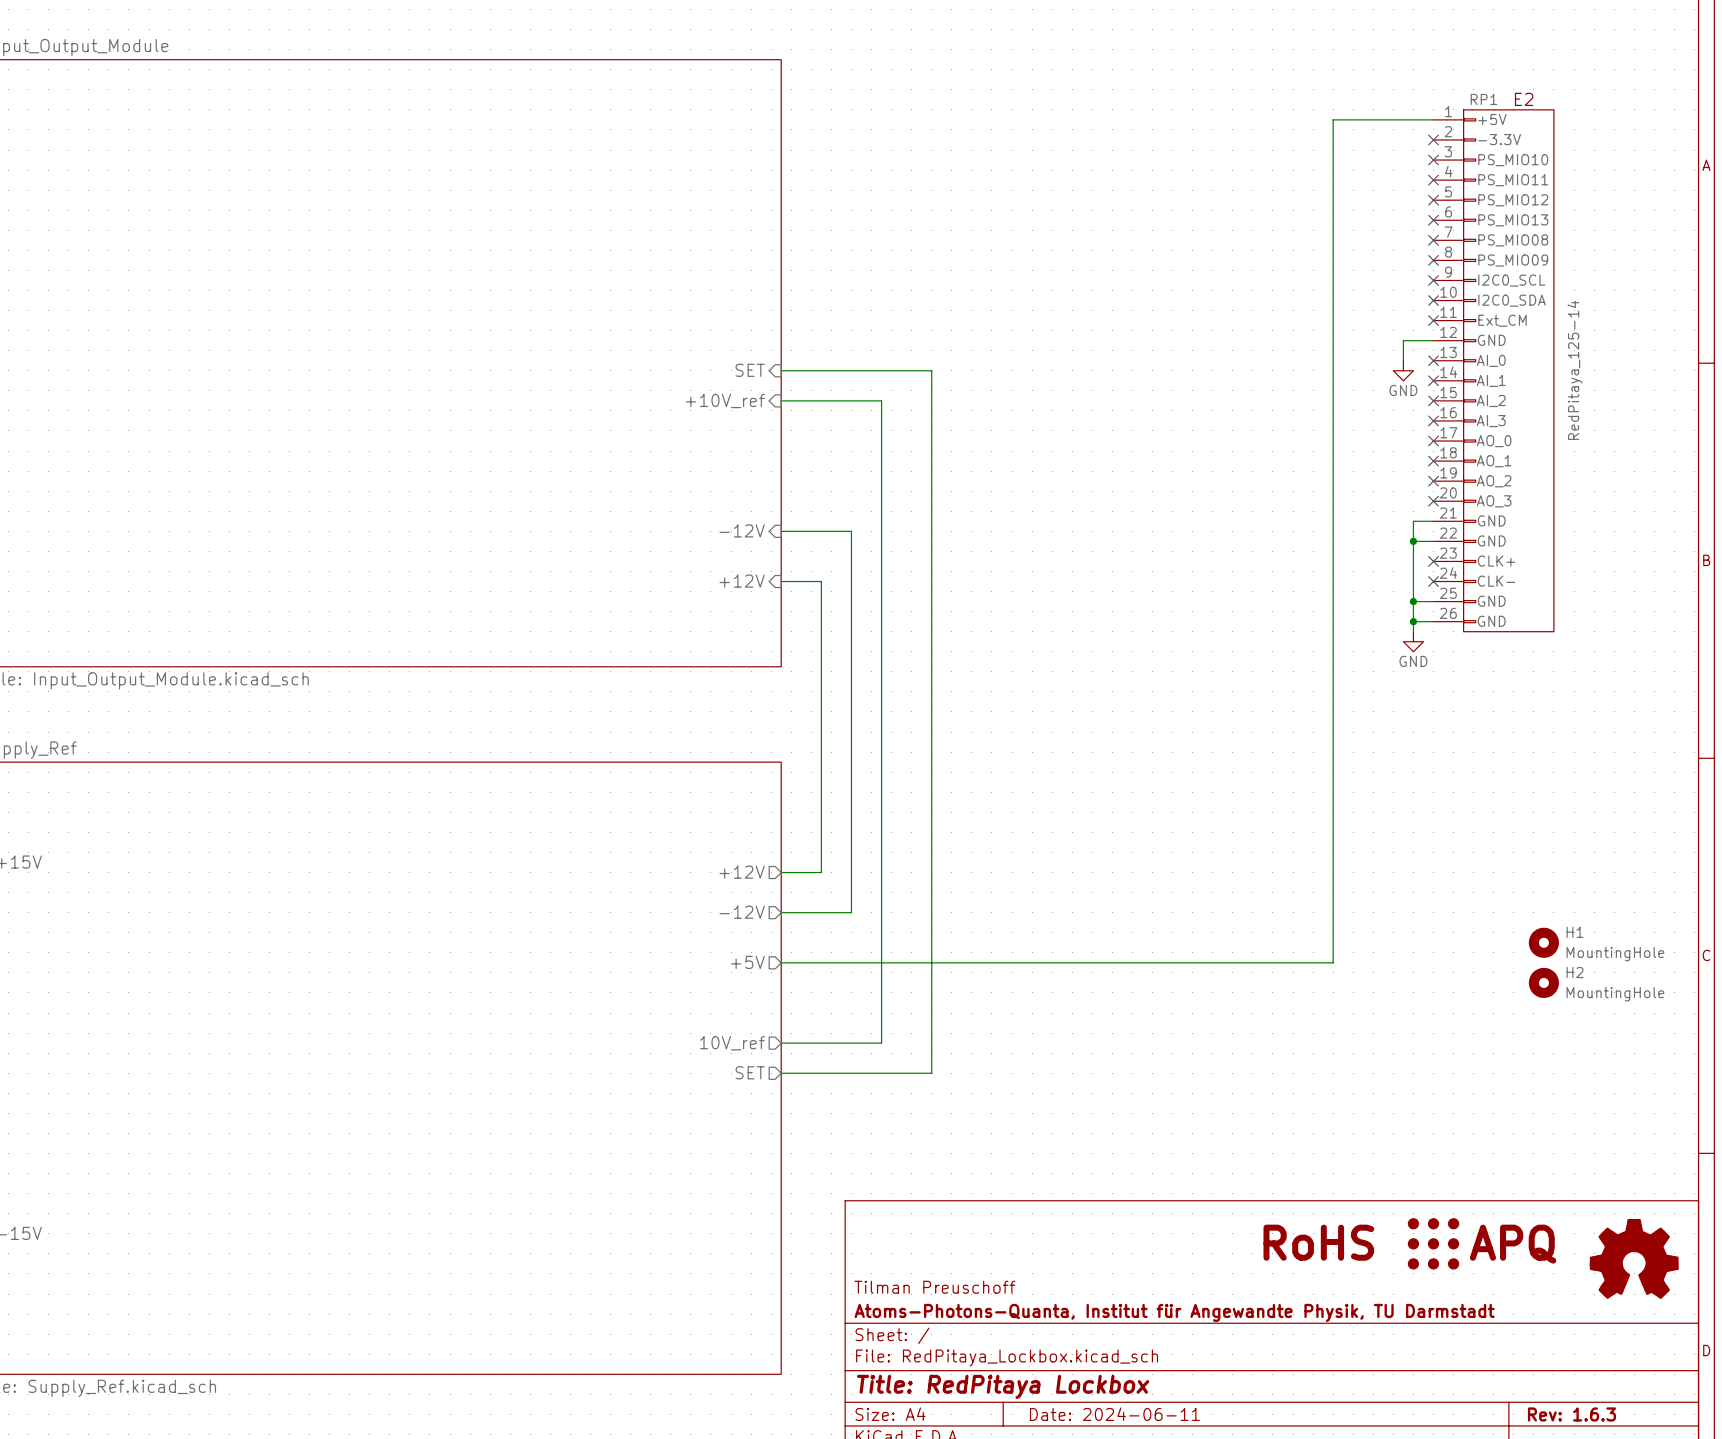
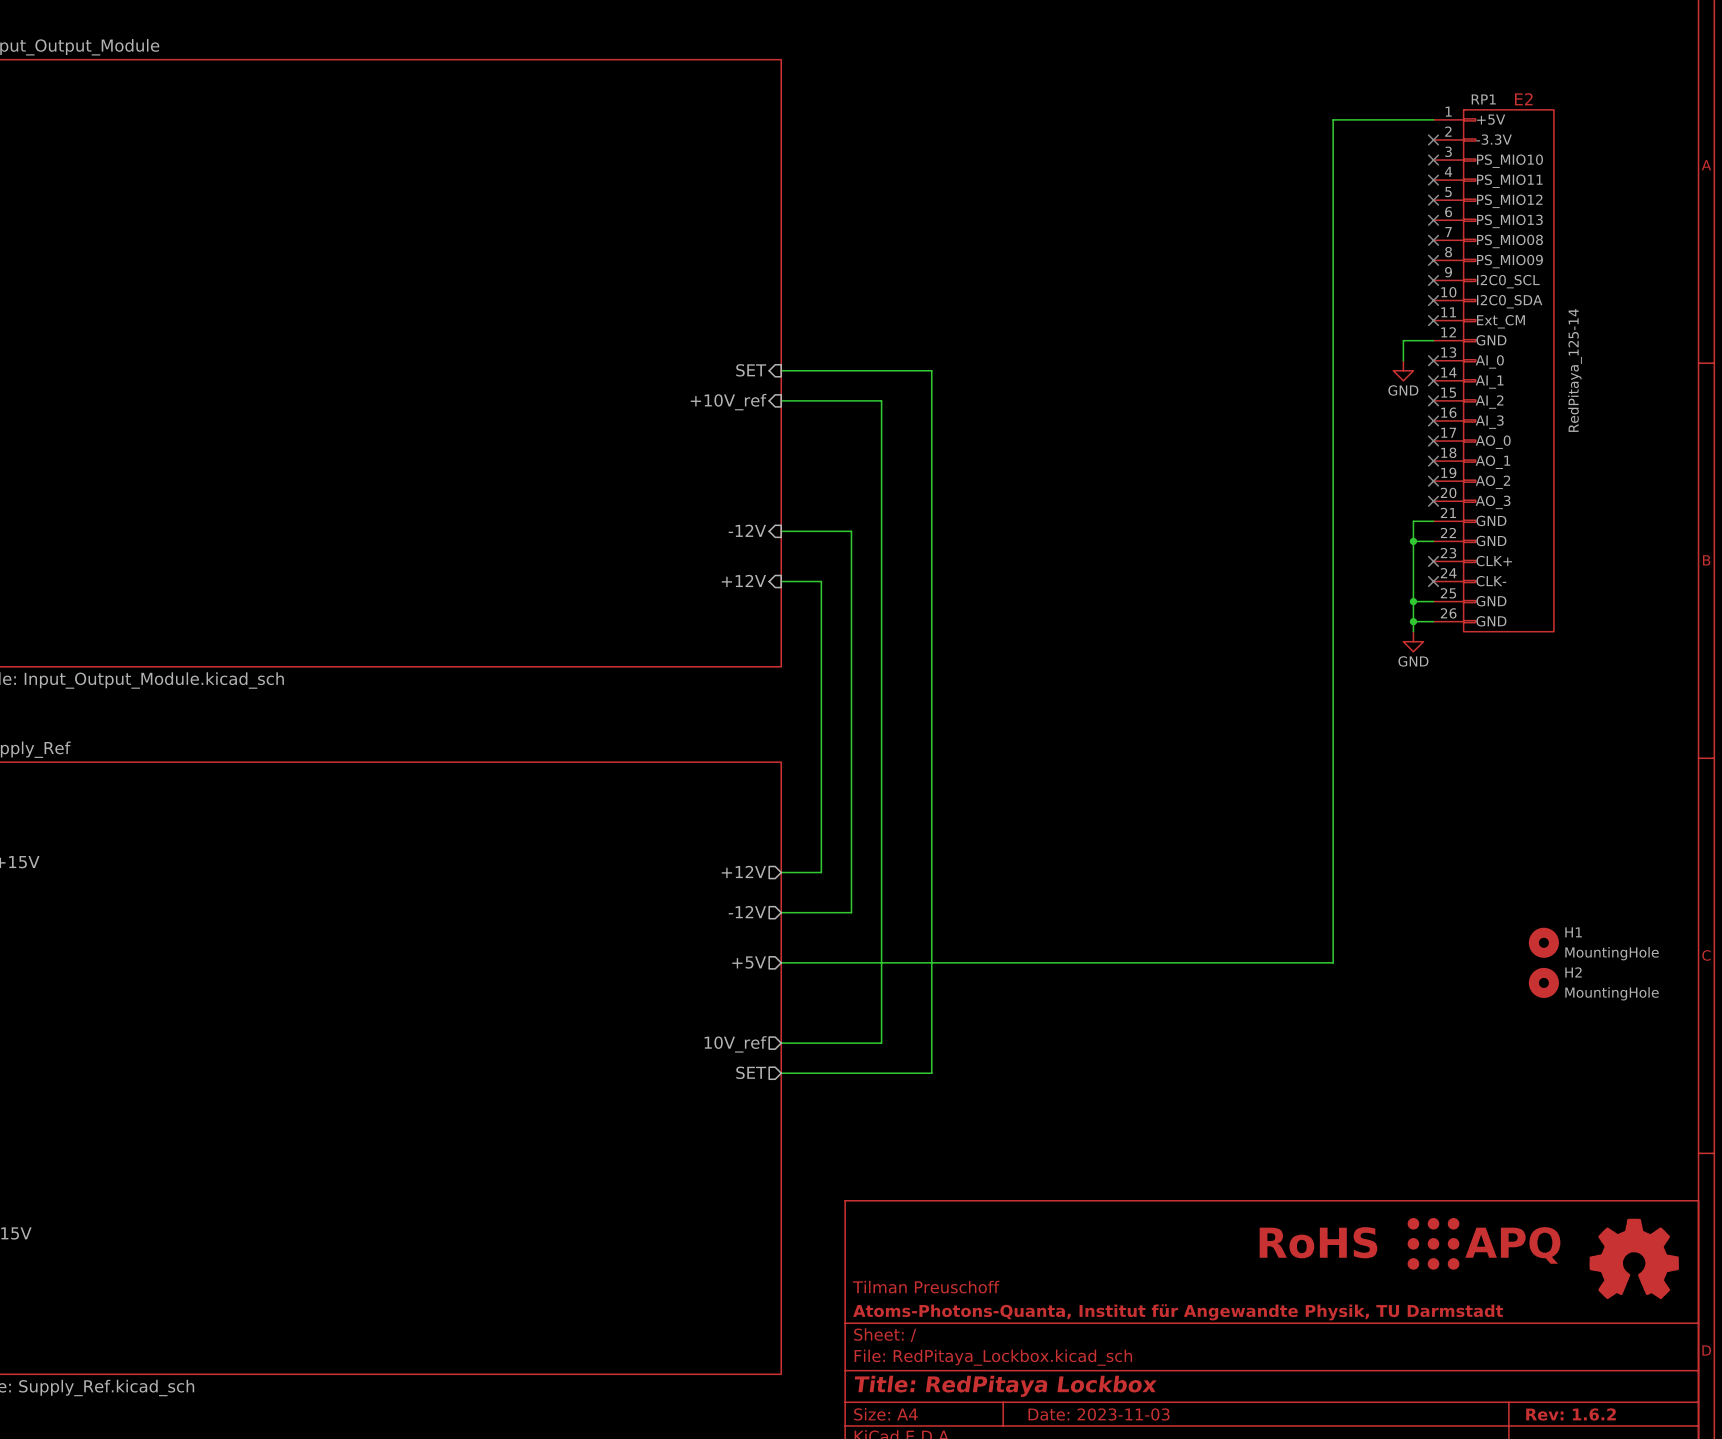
title block: Date: 2024-06-11 (1114, 1414) -> Date: 2023-11-03 (1099, 1414)
title block: Rev: 1.6.3 (1571, 1414) -> Rev: 1.6.2 (1571, 1414)

